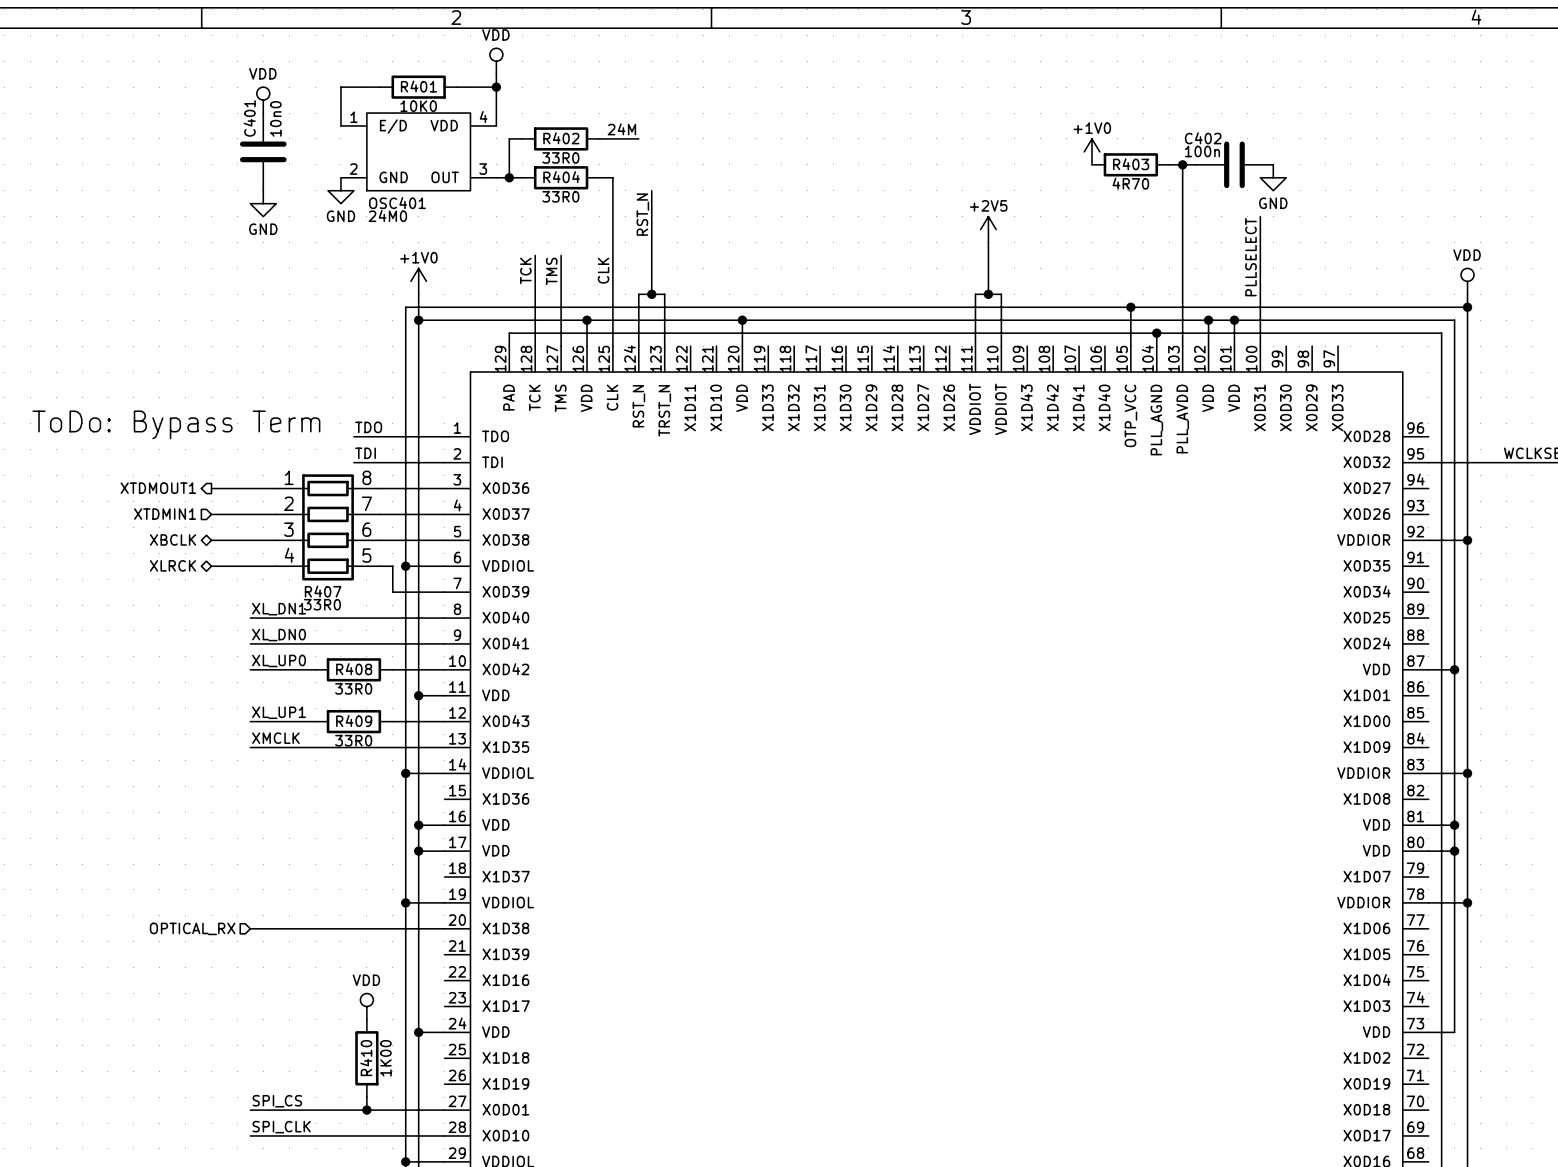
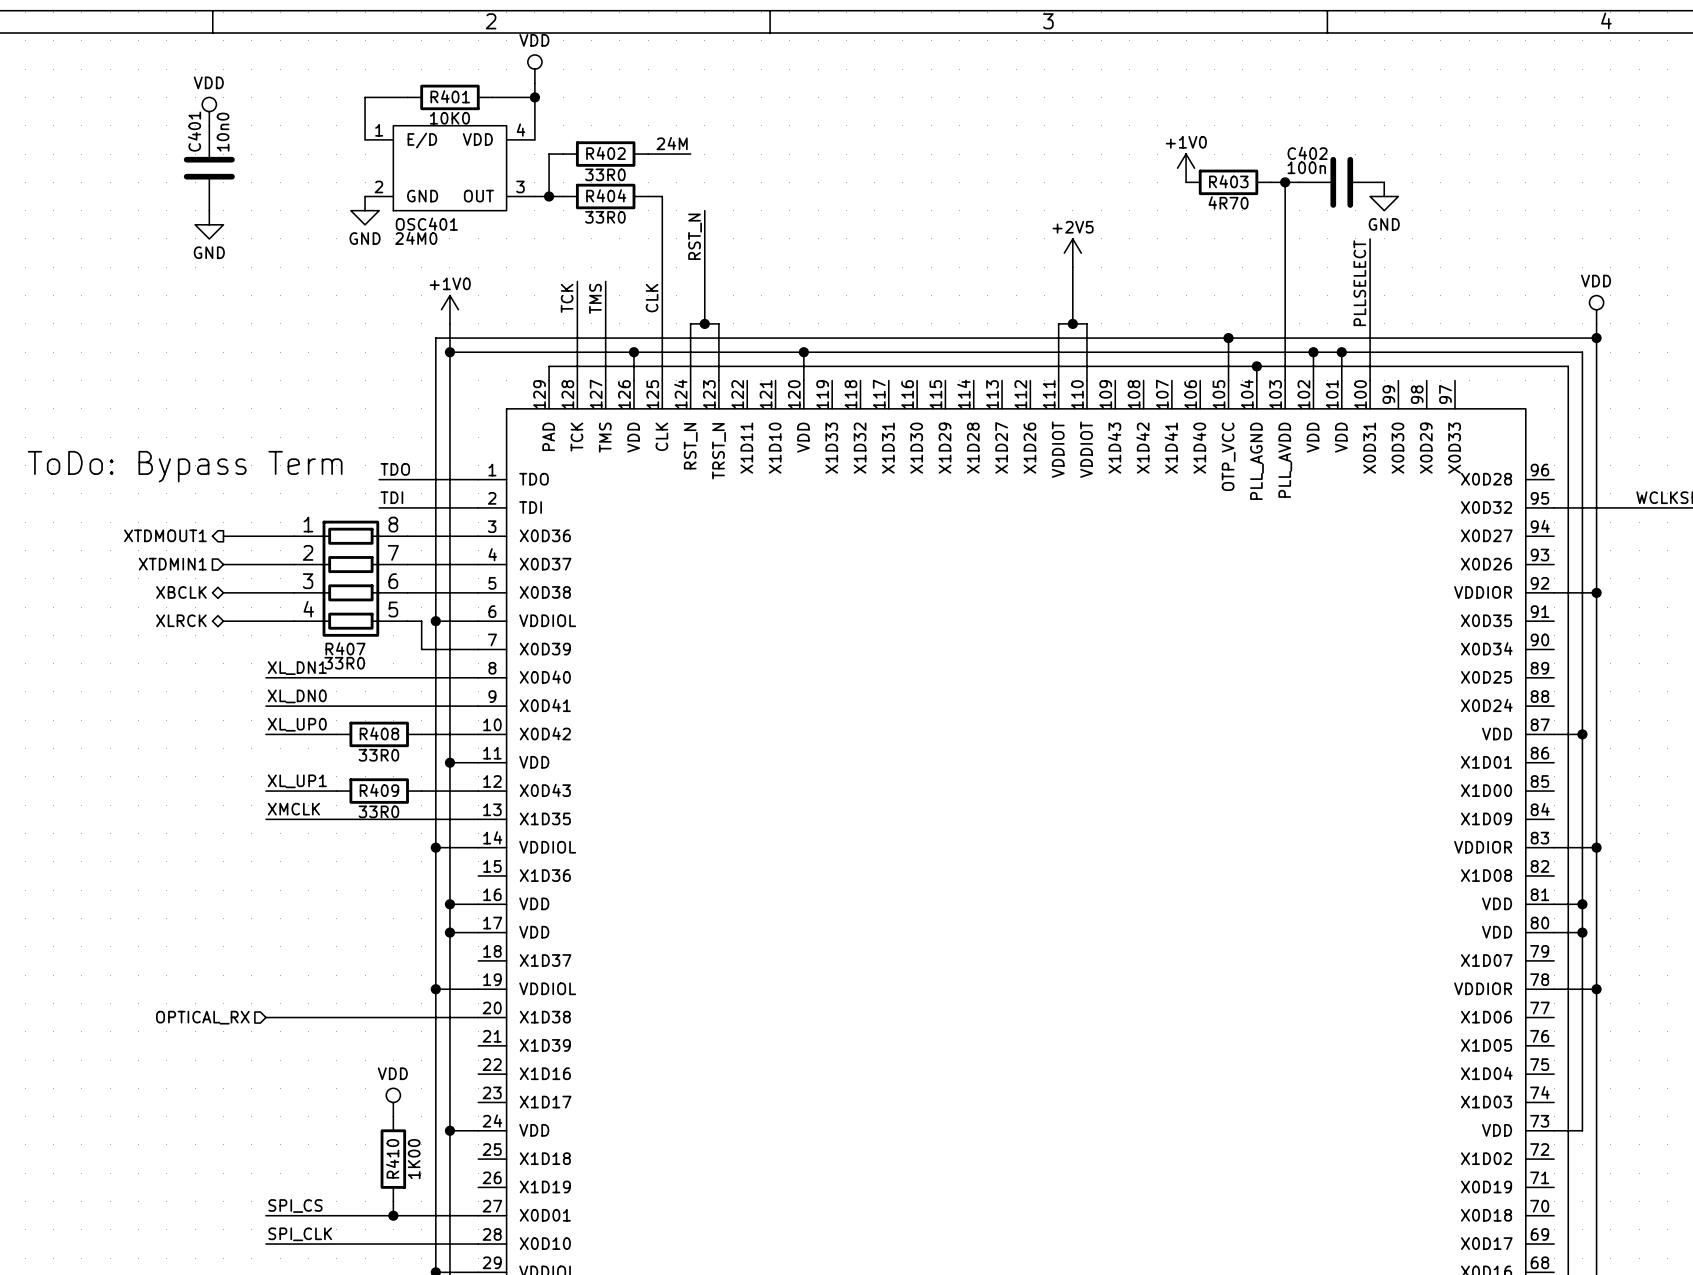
power symbol position: VDD (263, 100) -> VDD (209, 111)
C401 position: (263, 151) -> (209, 168)
power symbol position: GND (263, 203) -> GND (209, 224)

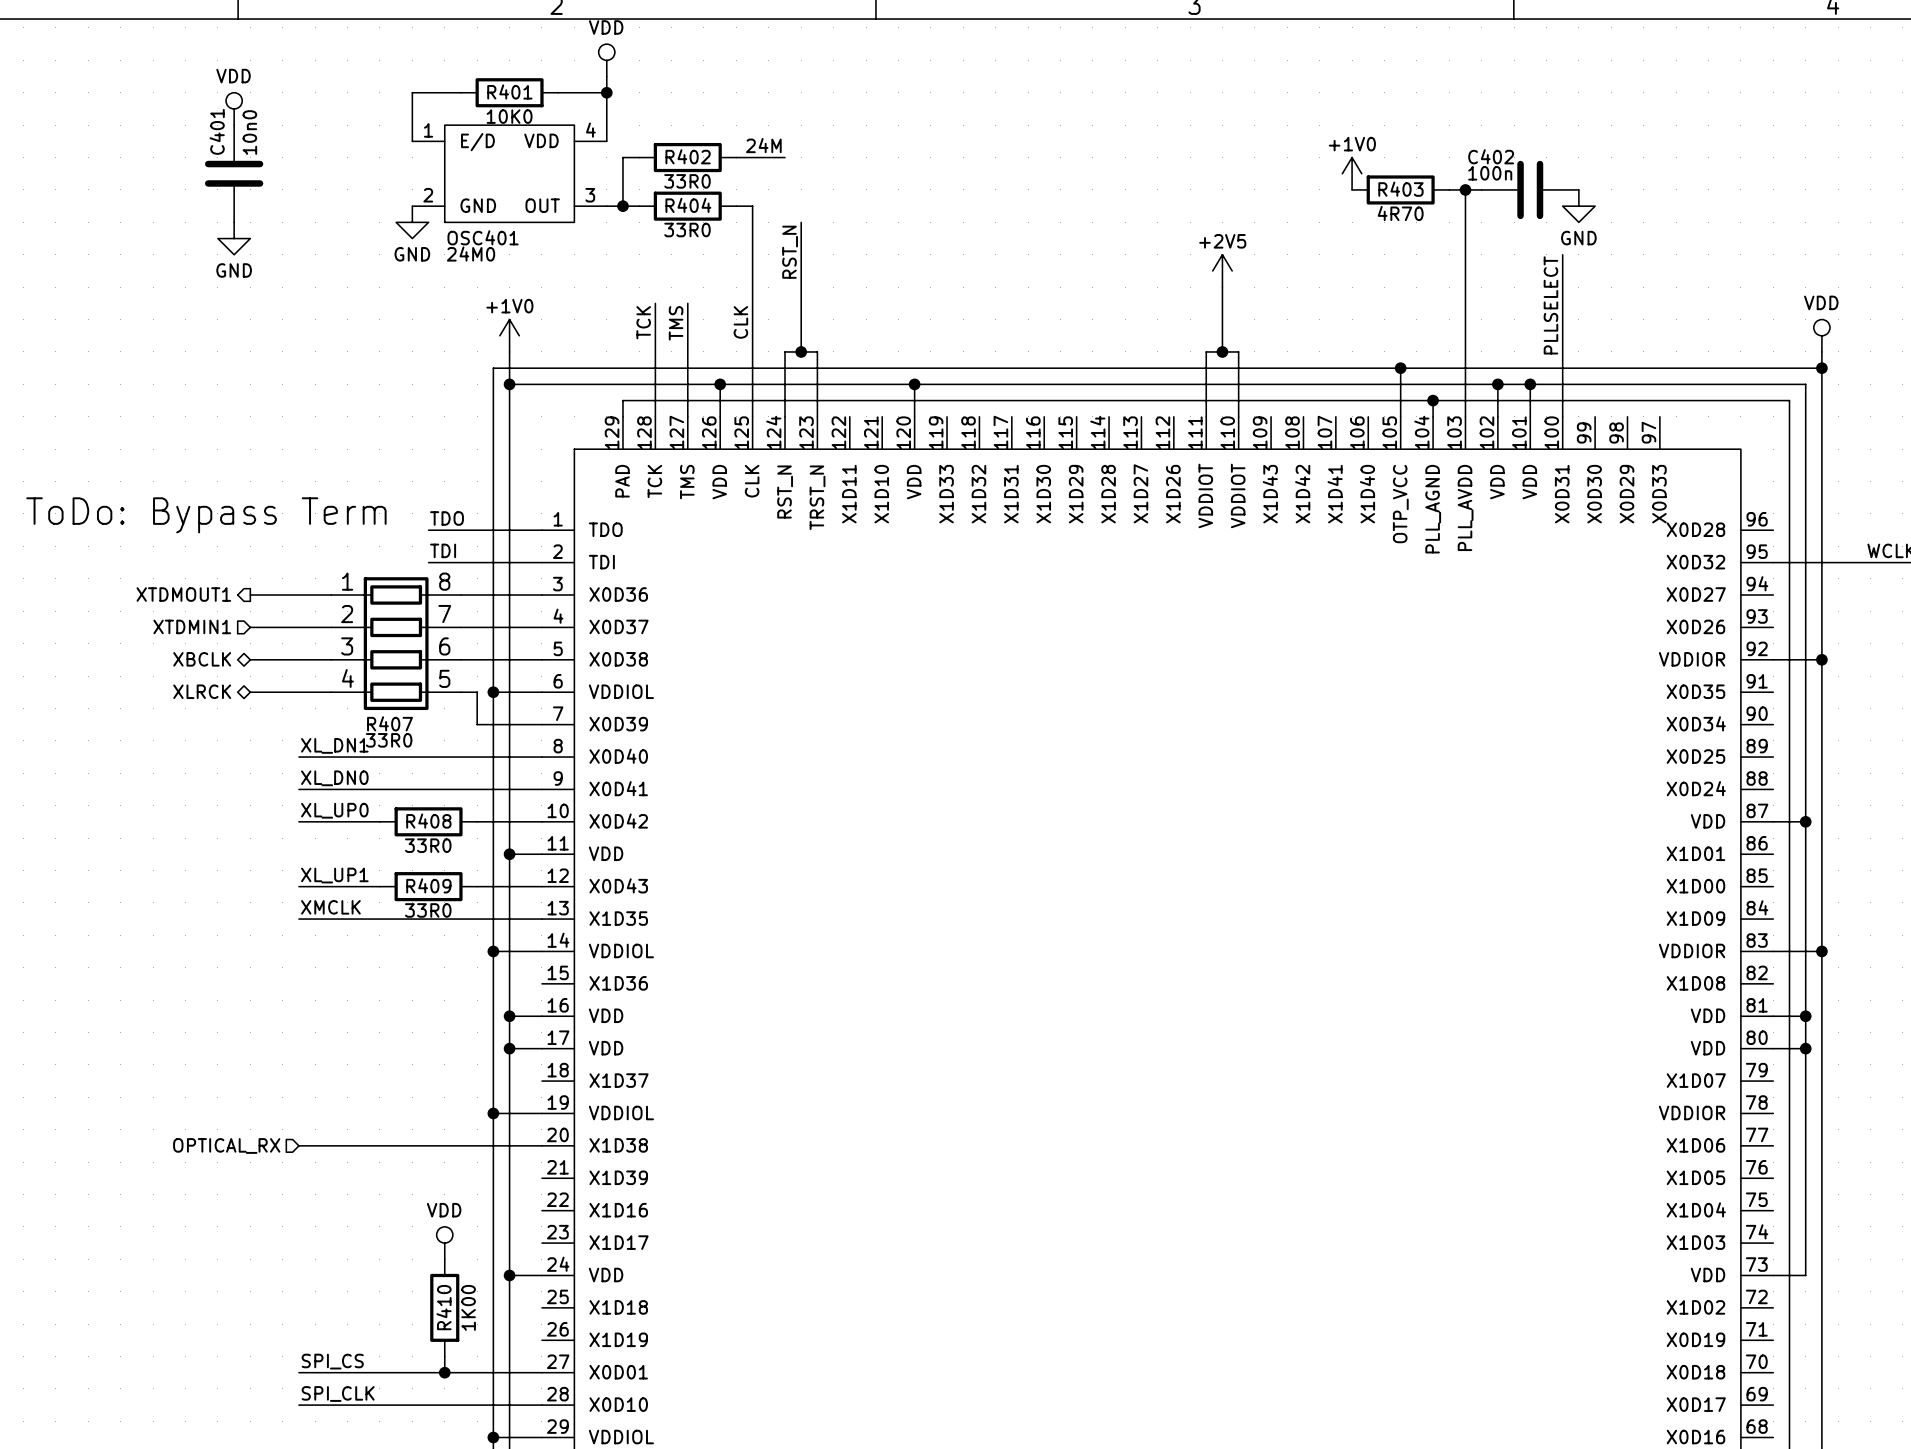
wire: (1554, 989) (1596, 989) -> none
junction: (1596, 989) -> none

